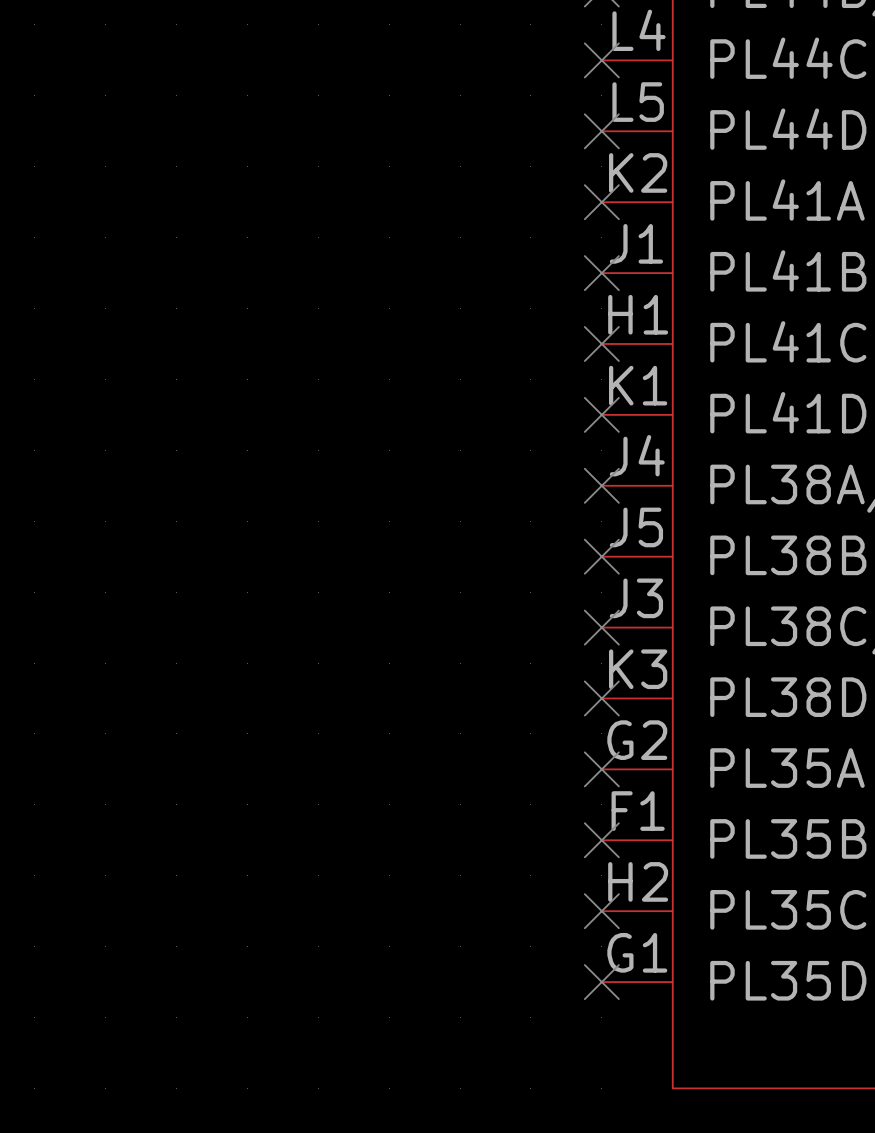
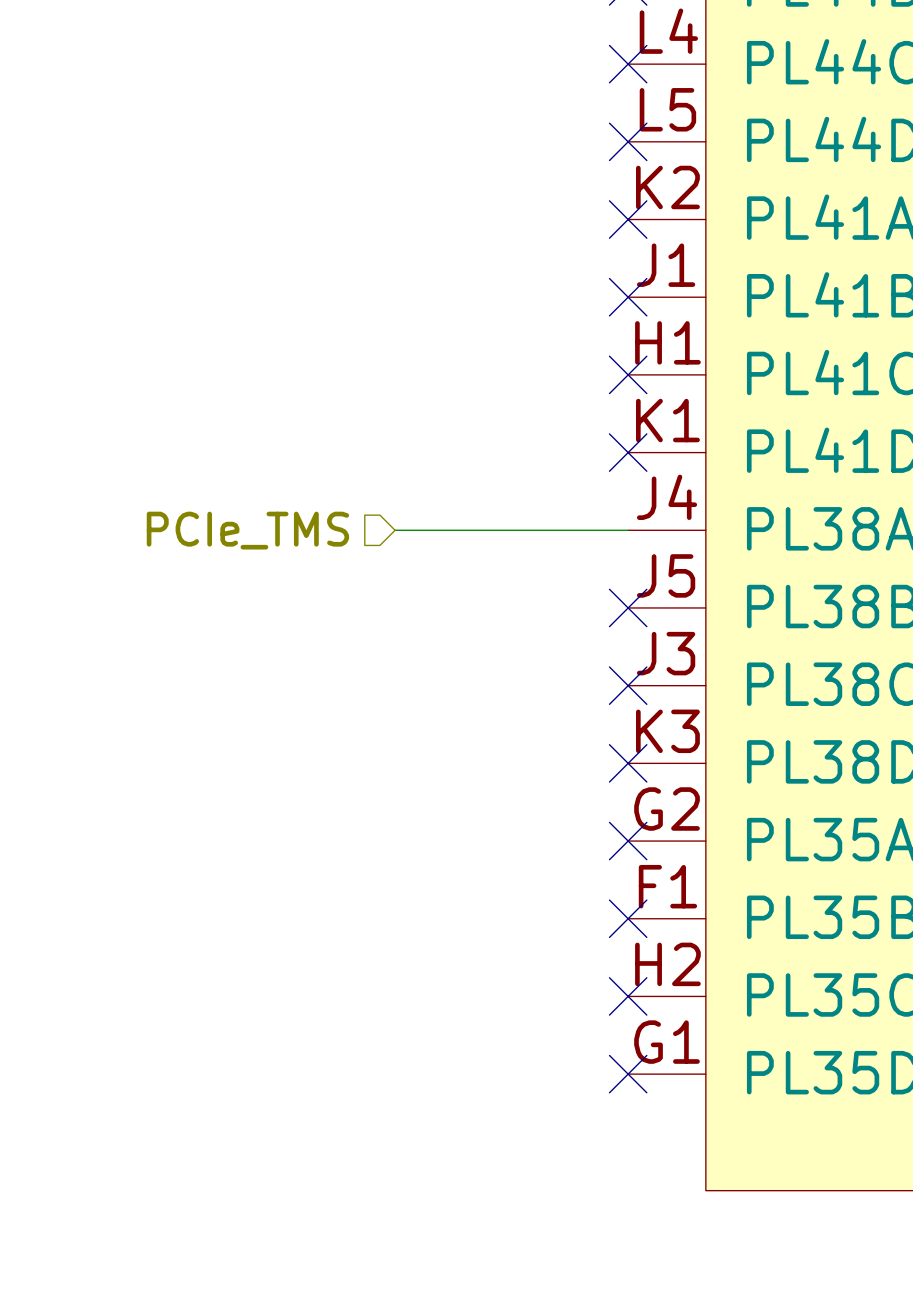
wire: none -> (395, 530) (628, 530)
no-connect mark: (601, 485) -> none
hierarchical label: none -> PCIe_TMS (247, 530)

